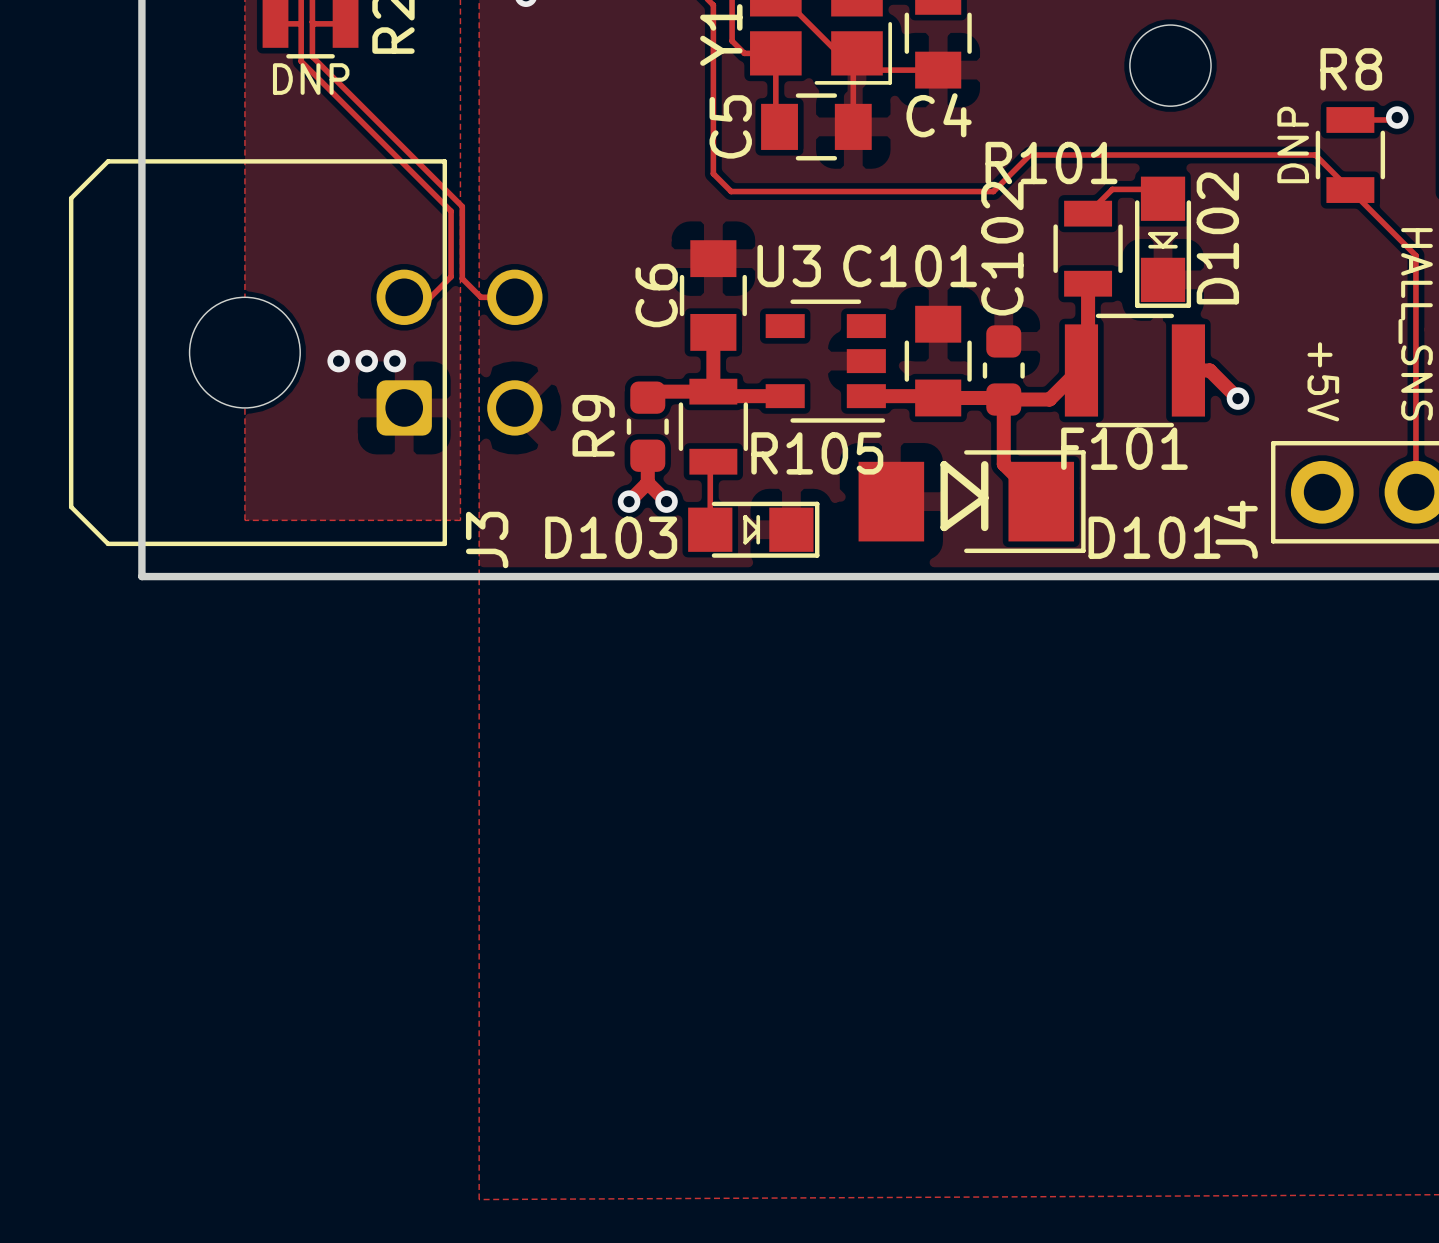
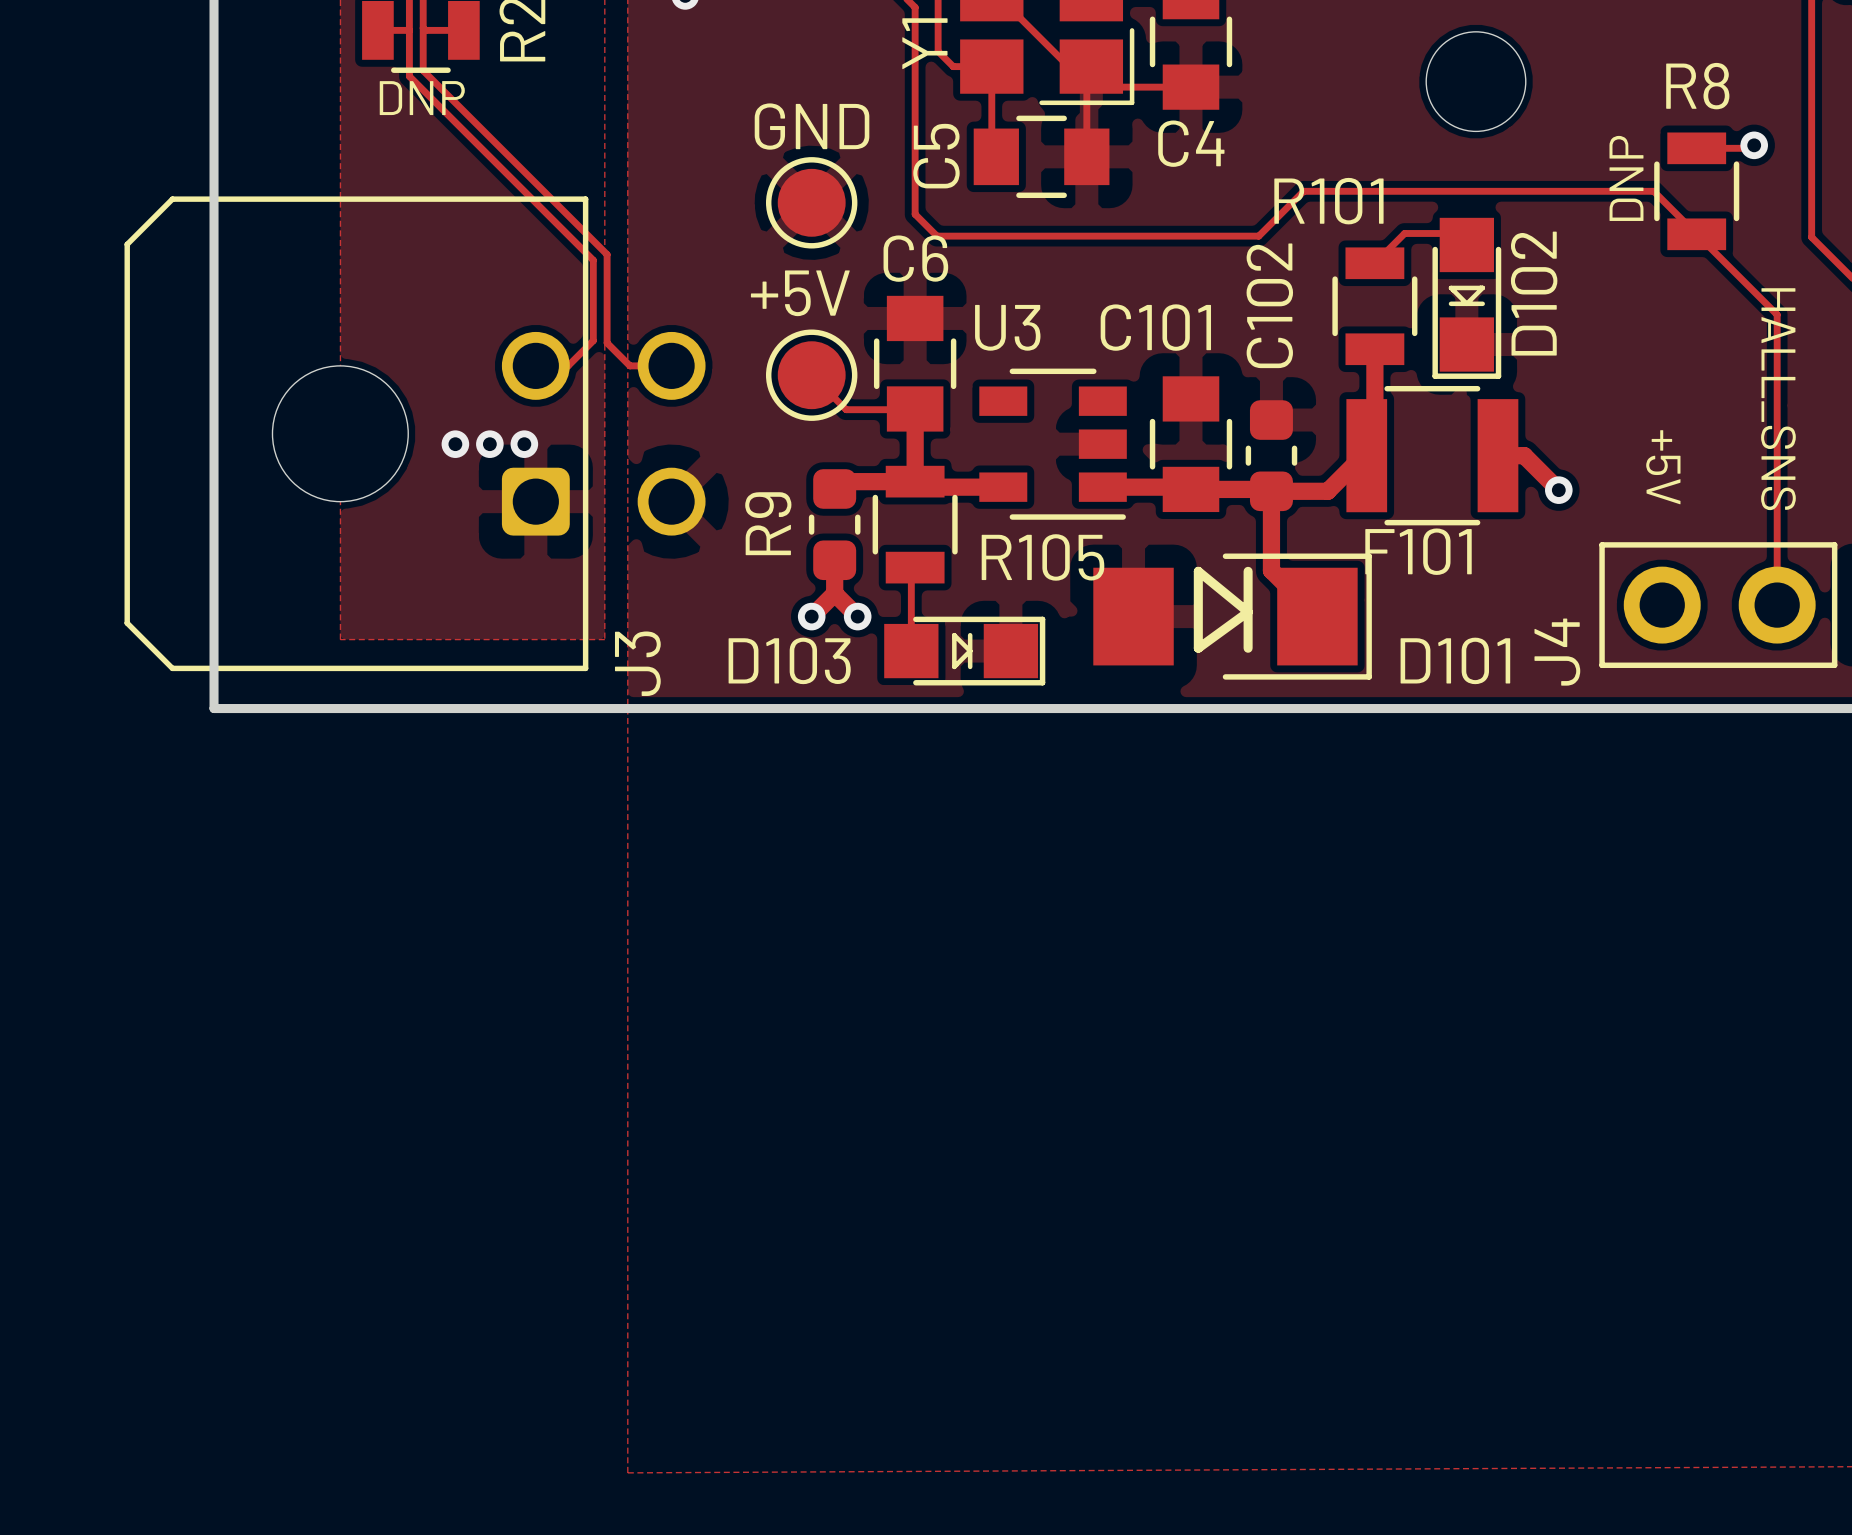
GND: none -> (811, 202)
C6 name rotation: 0° (656, 295) -> 90° clockwise (915, 258)
C6 name position: C6 (656, 295) -> C6 (915, 258)
track: none -> (811, 375) (846, 409) (915, 408)
+5V: none -> (811, 375)

